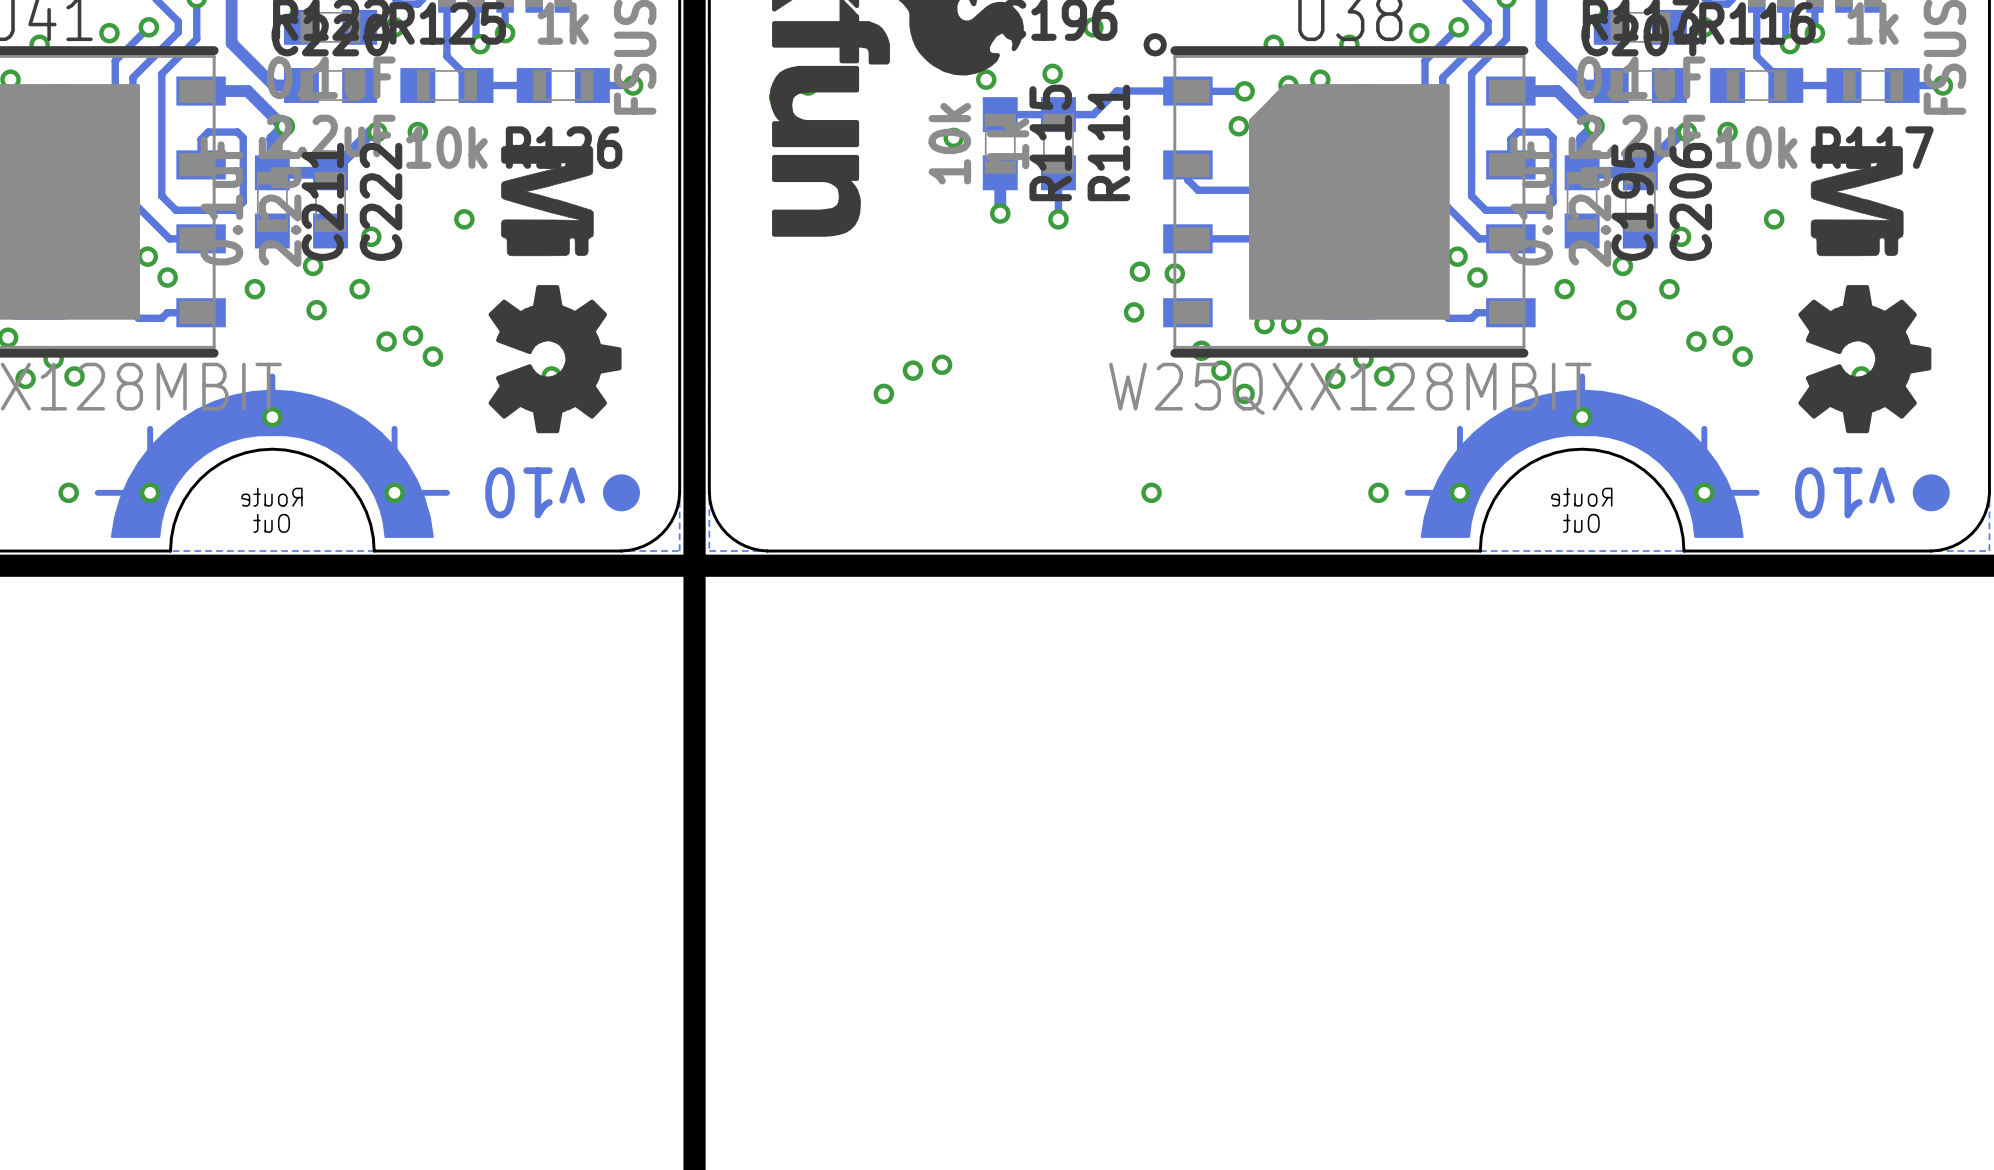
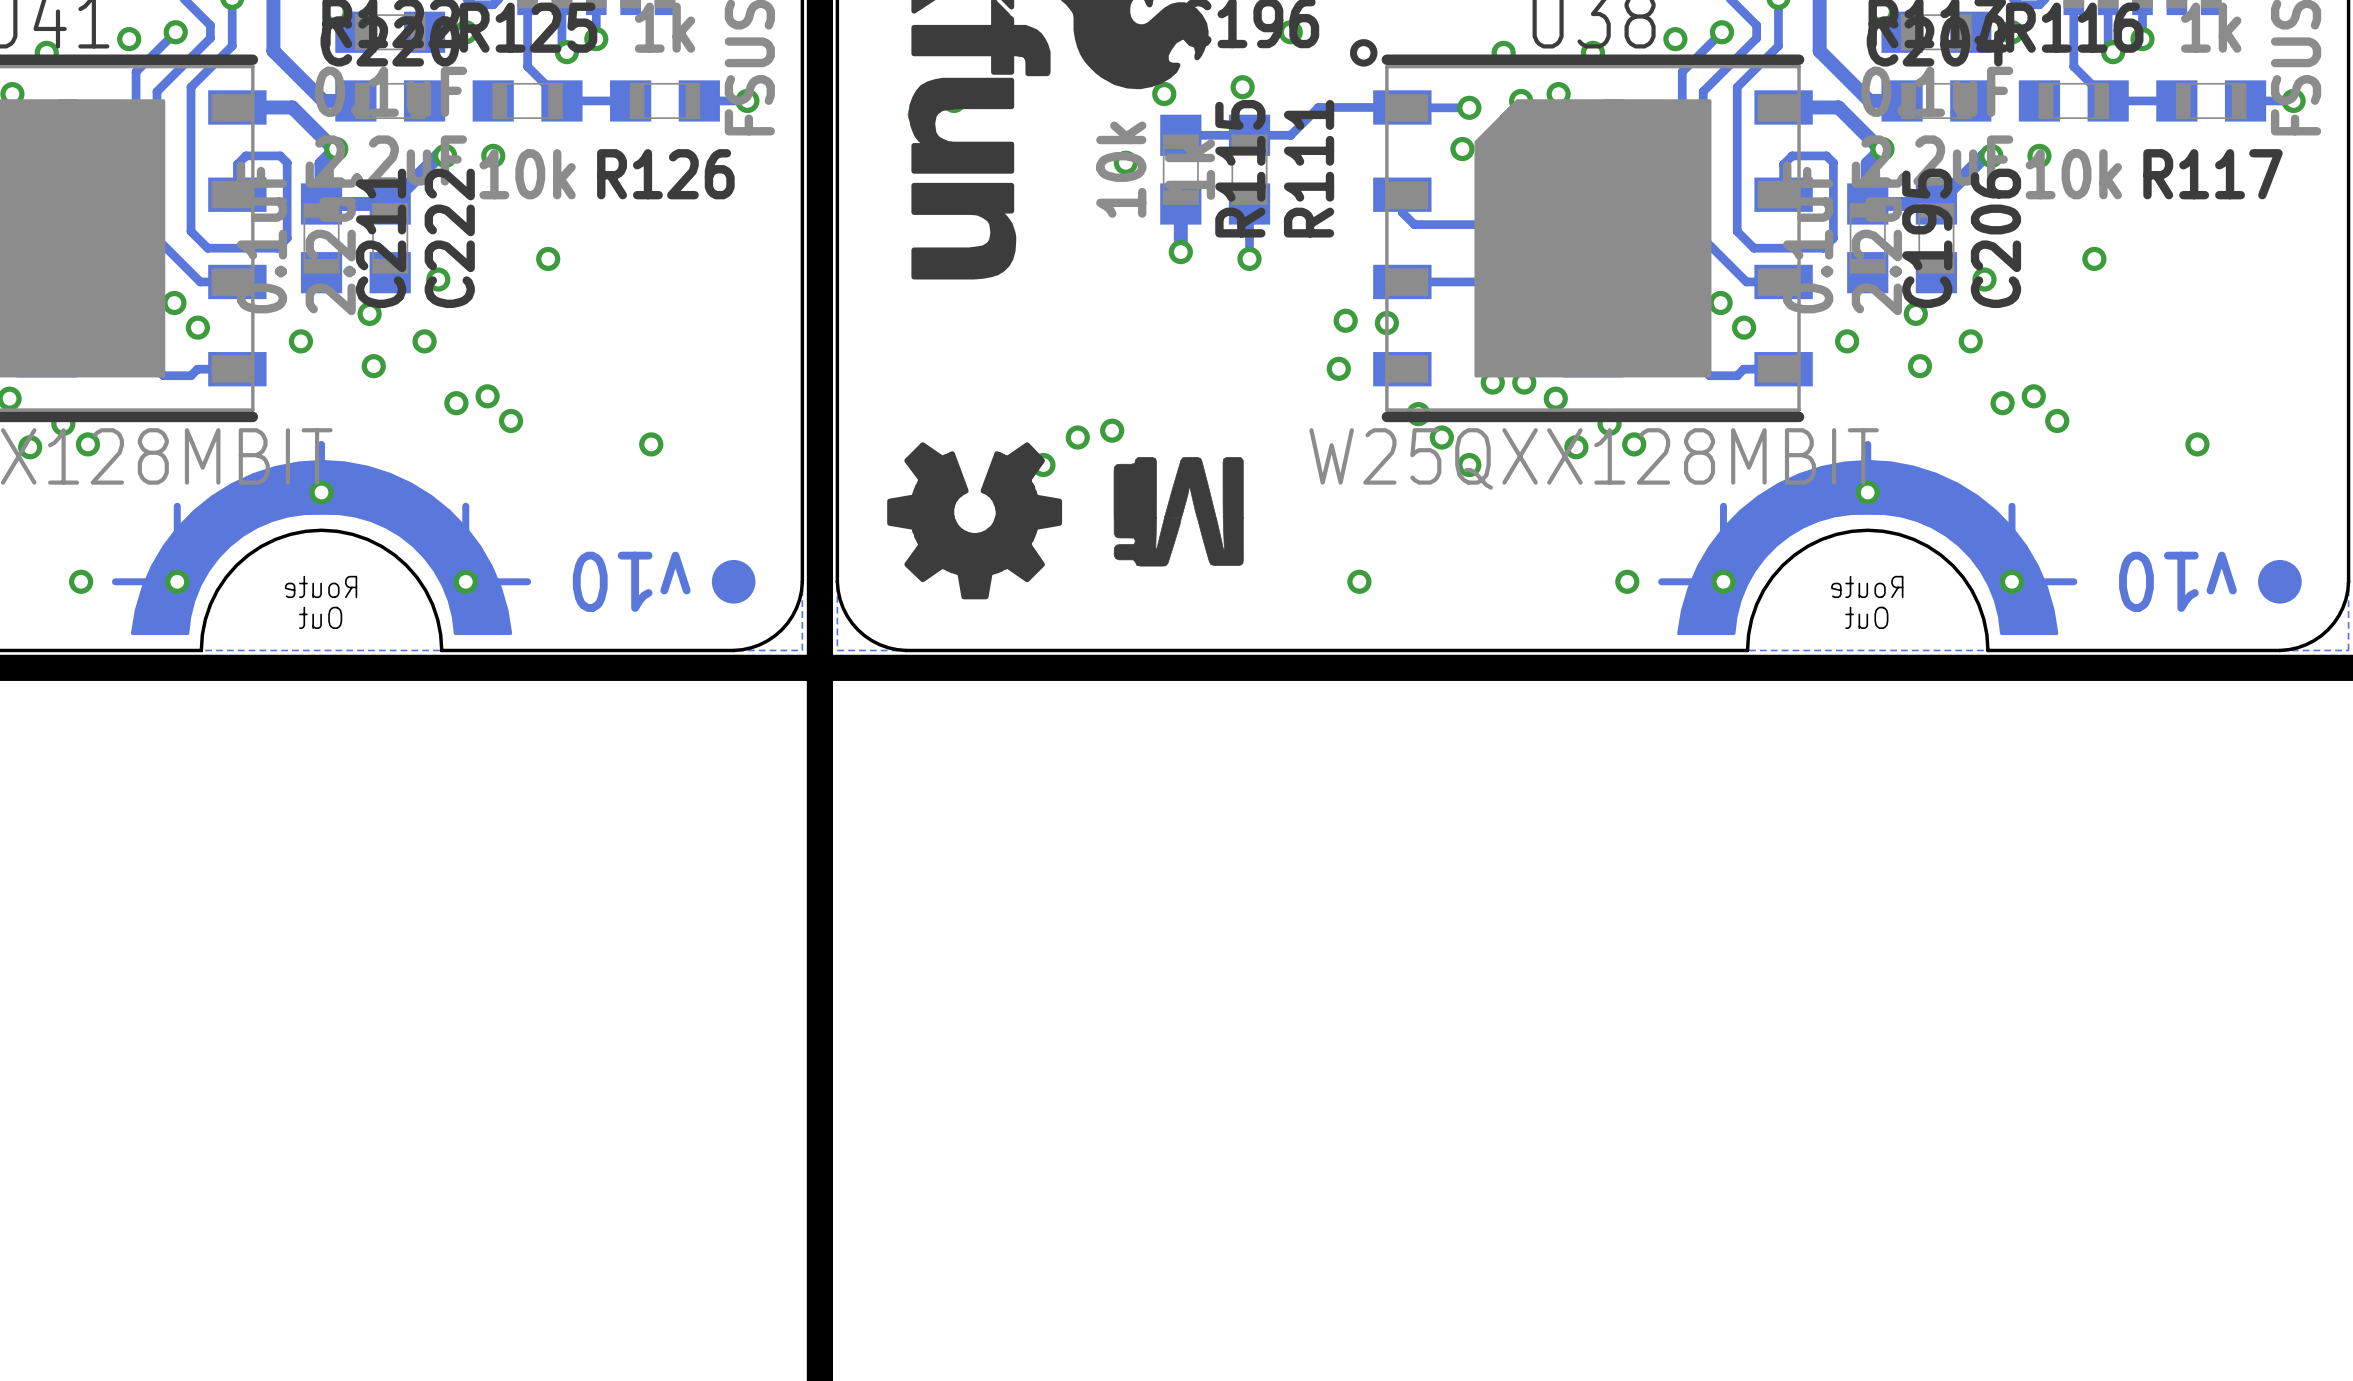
drawing: [488, 146, 622, 434] -> none
drawing: [1798, 146, 1932, 434] -> none
drawing: none -> [887, 442, 1244, 600]

